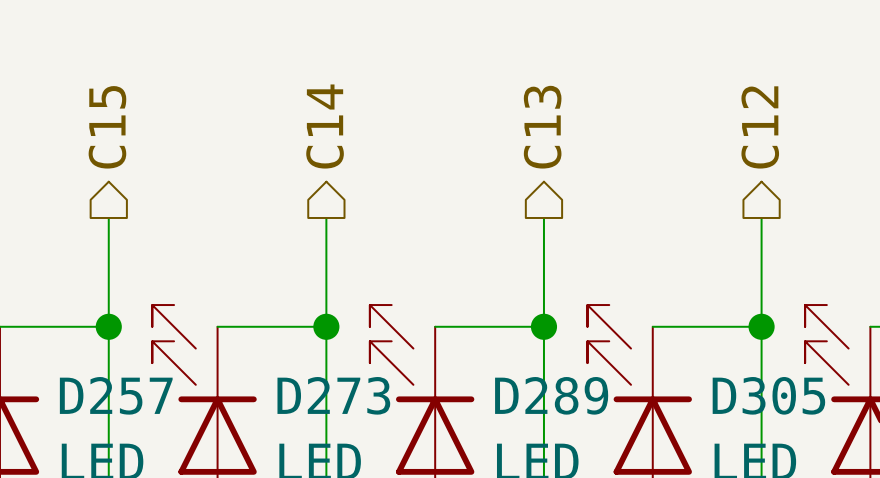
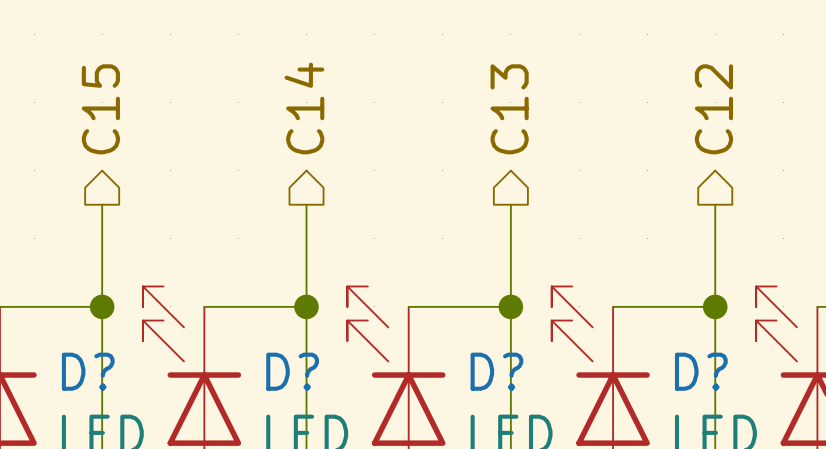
D257 name: D257 (116, 395) -> D? (88, 371)
D273 name: D273 (333, 395) -> D? (292, 371)
D289 name: D289 (551, 395) -> D? (496, 371)
D305 name: D305 (768, 395) -> D? (701, 371)

